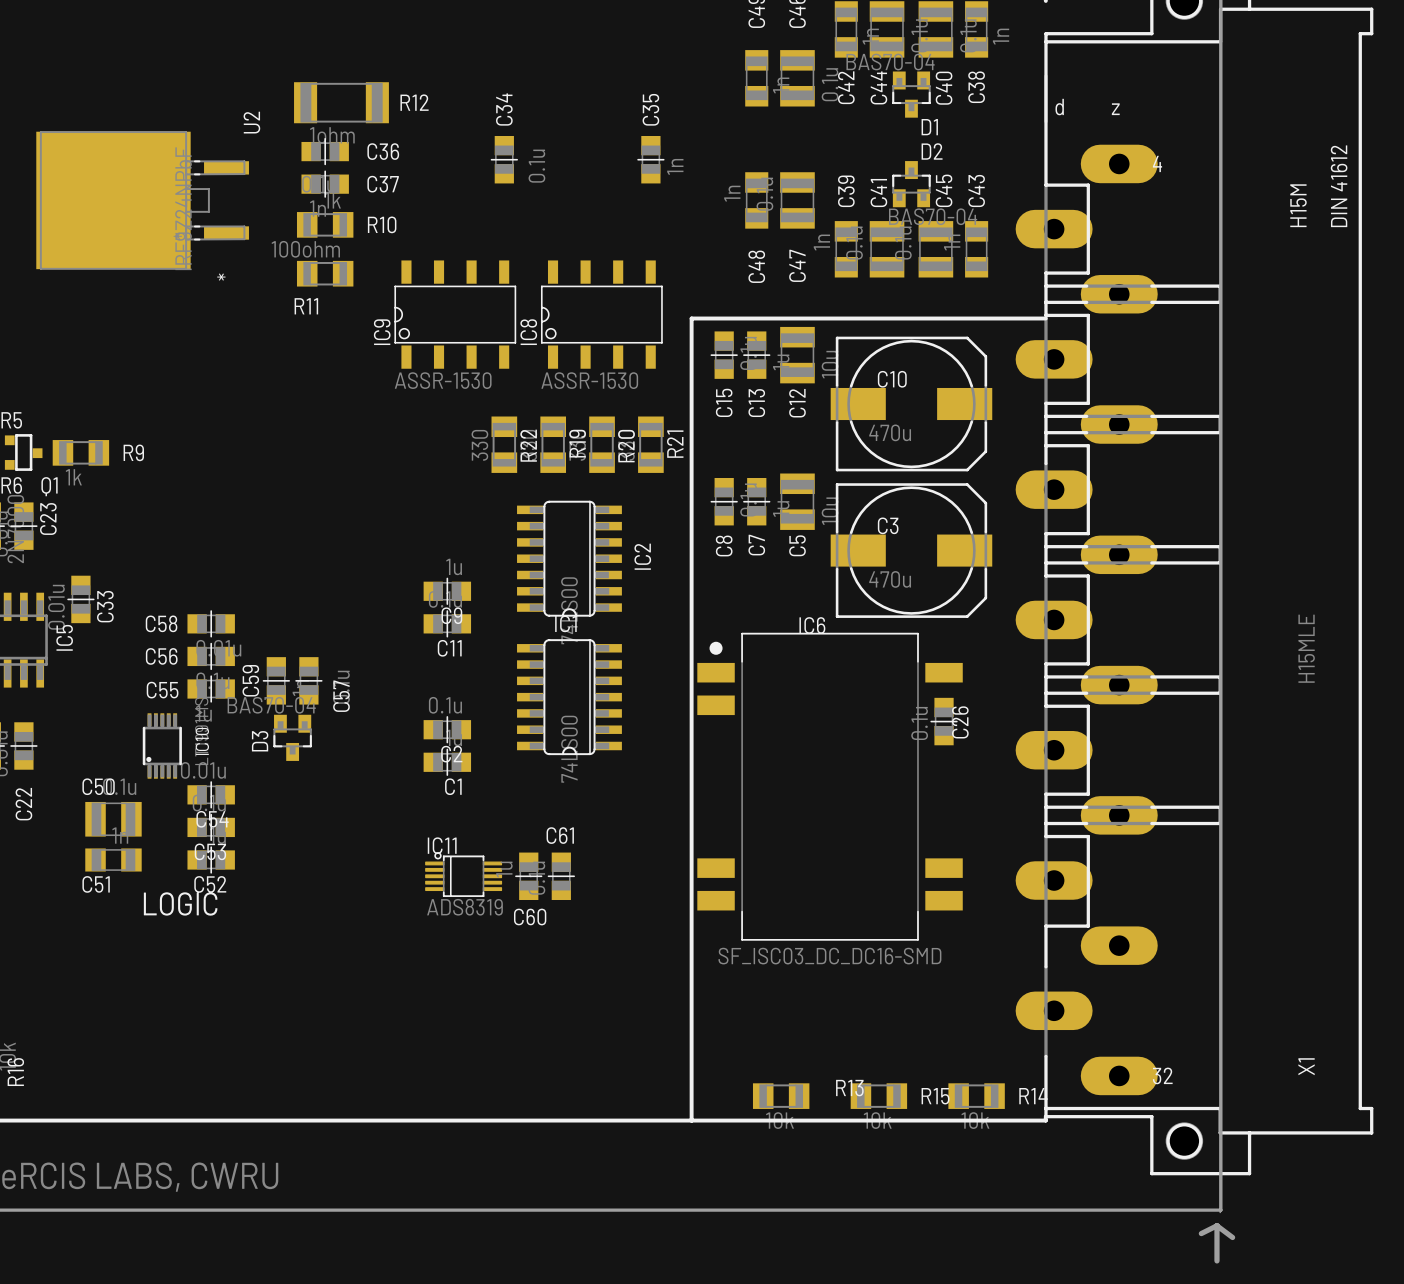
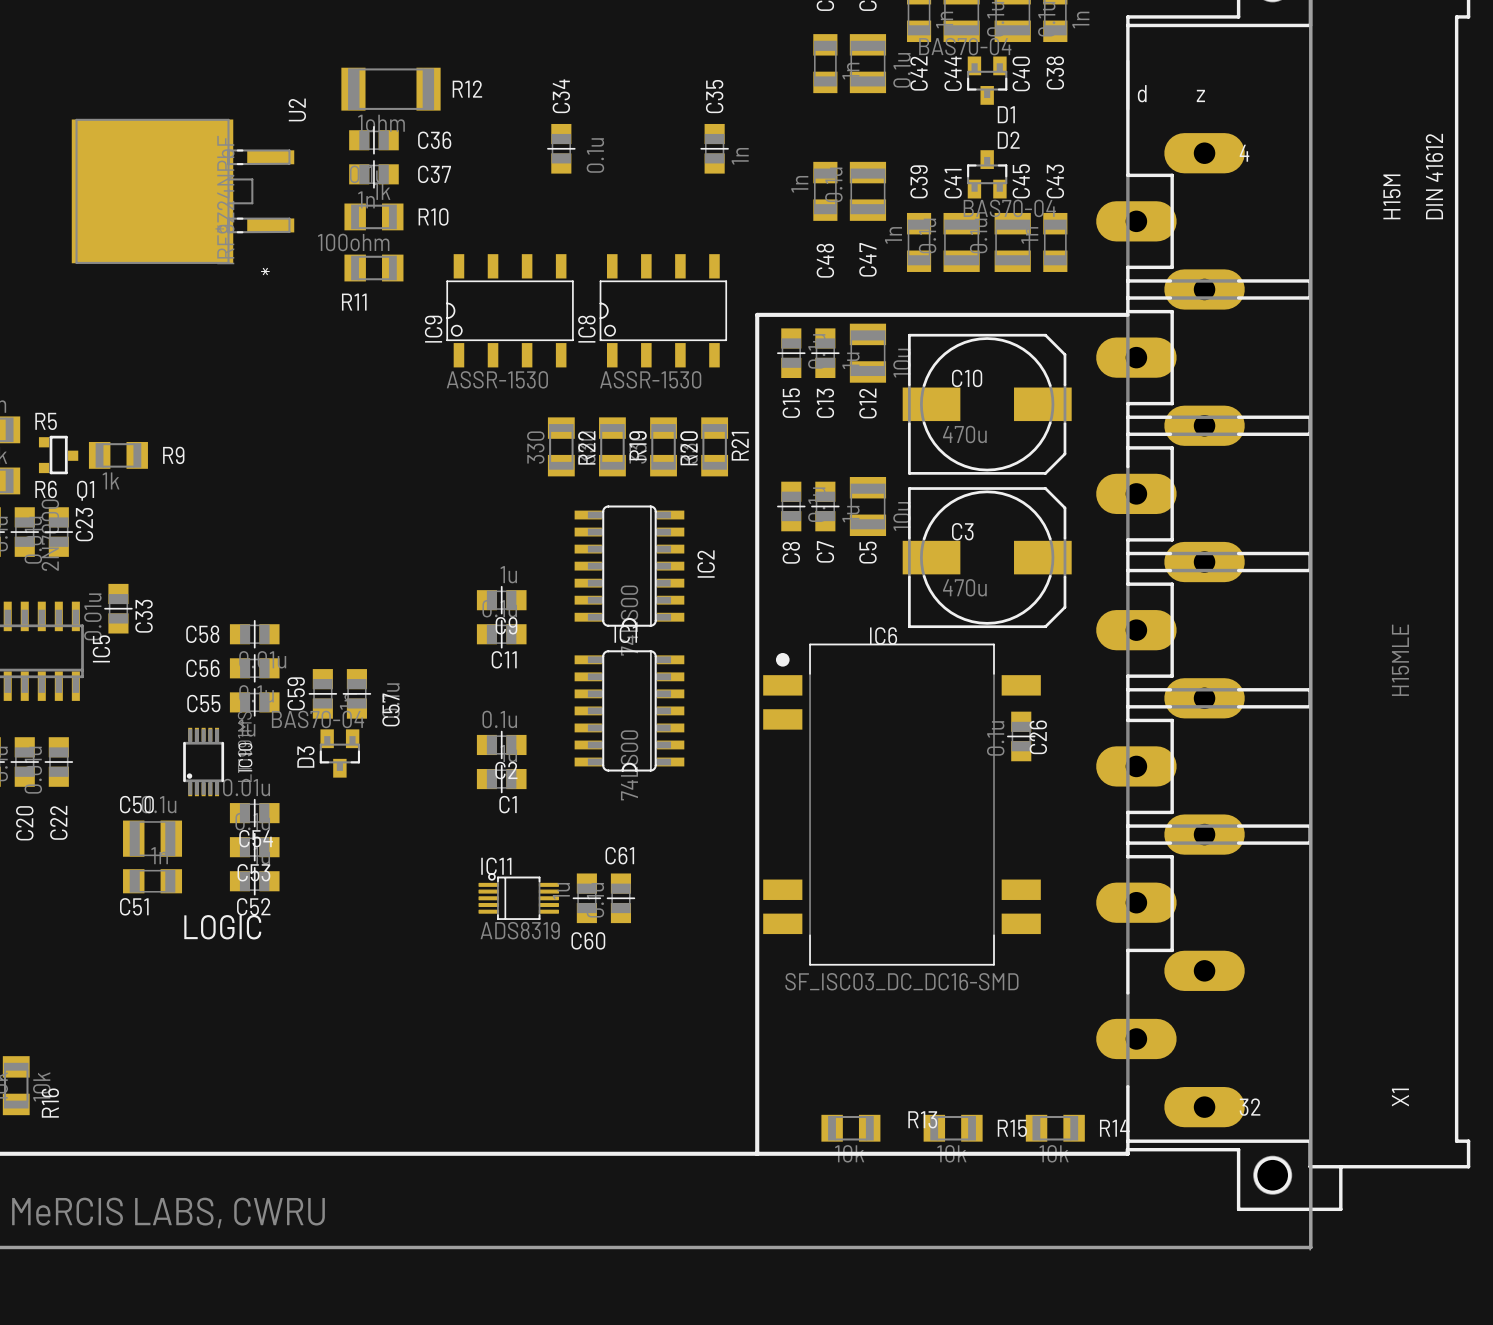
board edge: (1216, 1225) (1216, 1260) -> none
board edge: (1216, 1225) (1201, 1233) -> none
board edge: (1216, 1225) (1232, 1237) -> none

